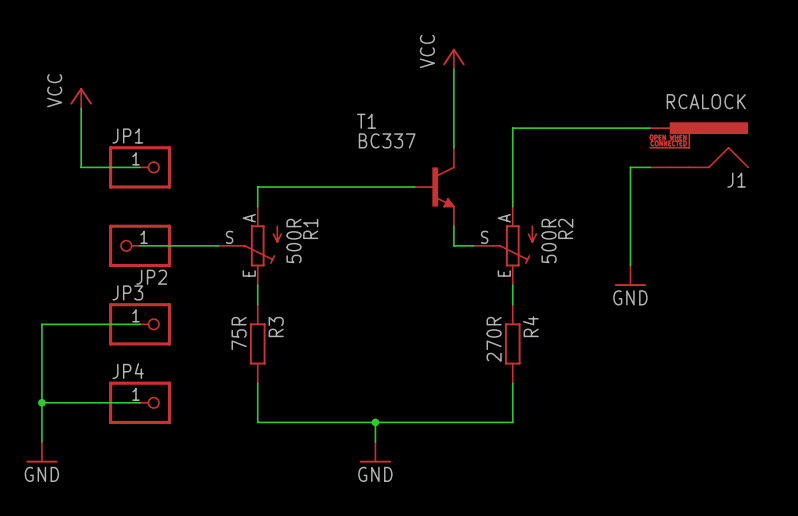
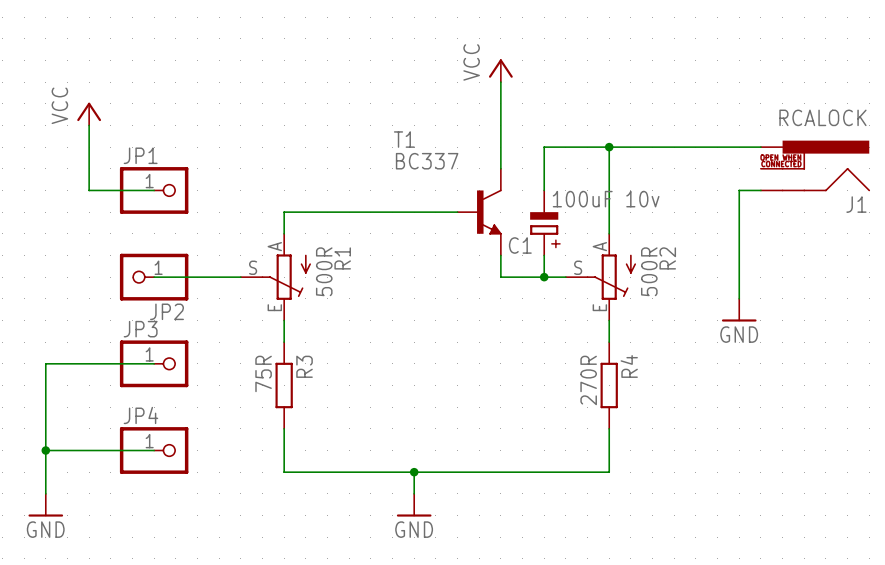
wire: (512, 128) (512, 206) -> (565, 147) (544, 147) (544, 190)
wire: none -> (609, 147) (609, 233)
junction: none -> (609, 147)
J1 position: (699, 145) -> (815, 165)
wire: (650, 167) (630, 167) (630, 265) -> (760, 190) (739, 190) (739, 298)
C1: none -> 100uF 10v (544, 222)
wire: none -> (544, 255) (544, 277)
junction: none -> (544, 277)
R2 position: (505, 245) -> (600, 277)
power symbol position: GND (630, 275) -> GND (739, 310)
wire: (512, 285) (512, 304) -> (609, 320) (609, 342)
R4 position: (512, 343) -> (609, 385)
wire: (512, 383) (512, 422) -> (609, 428) (609, 472) (565, 472)

